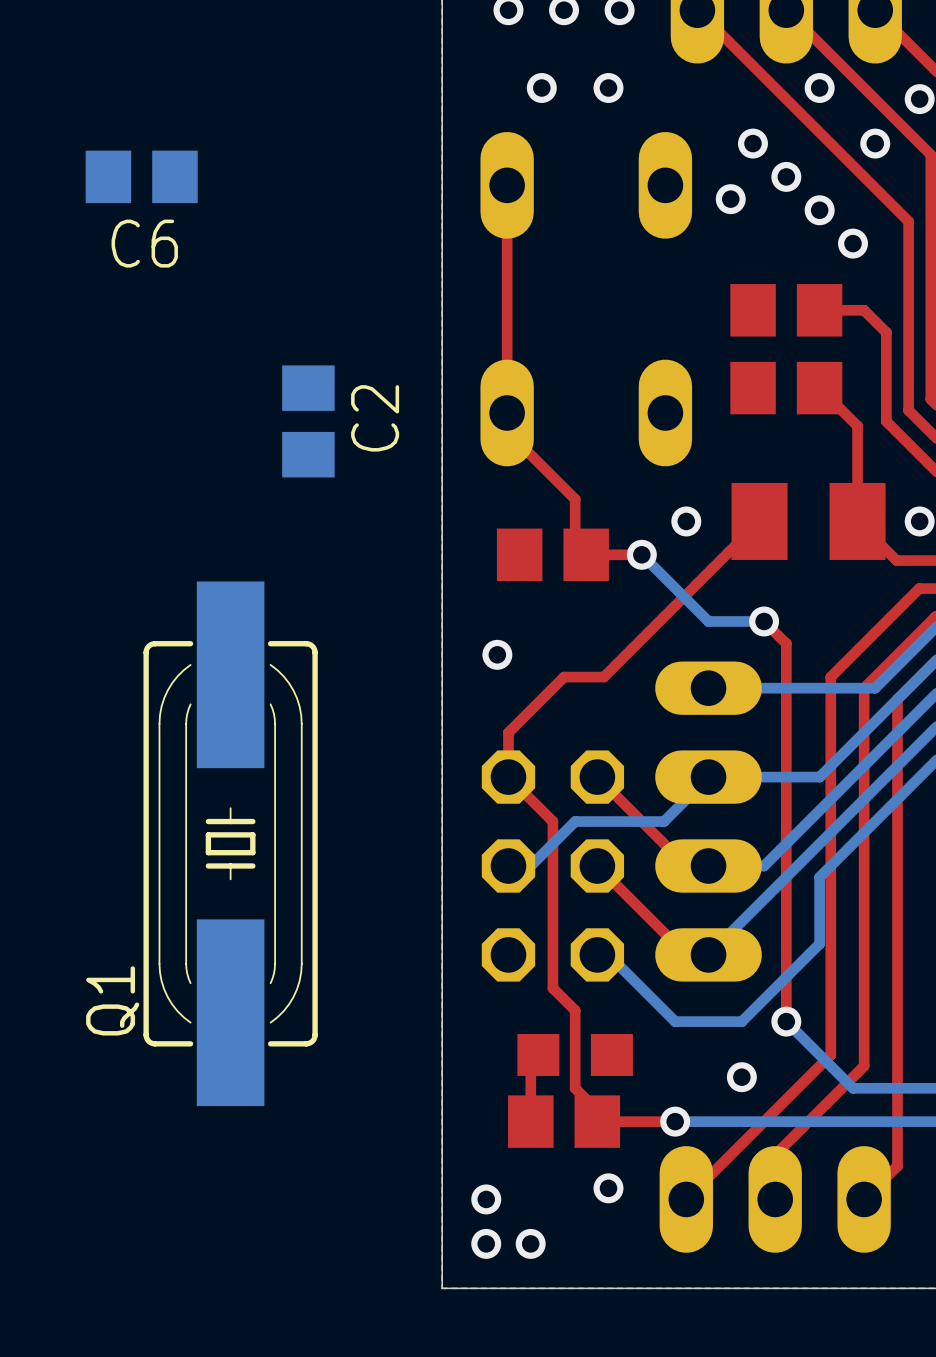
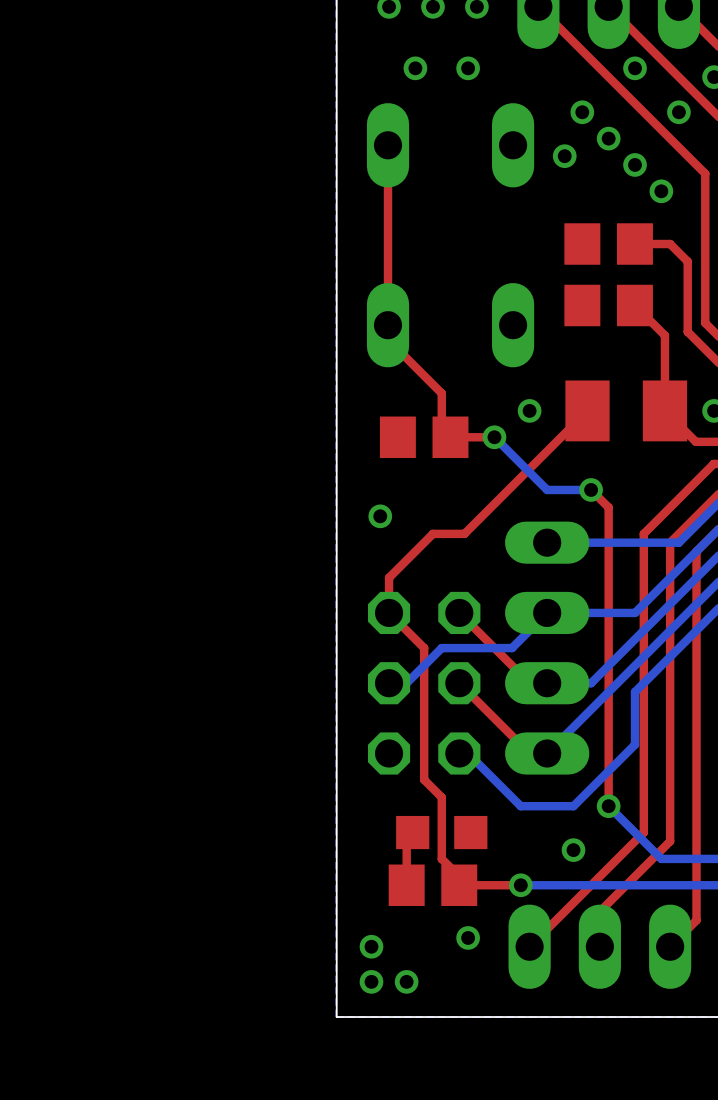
C6: (141, 176) -> none
C2: (308, 421) -> none
Q1: (230, 843) -> none

